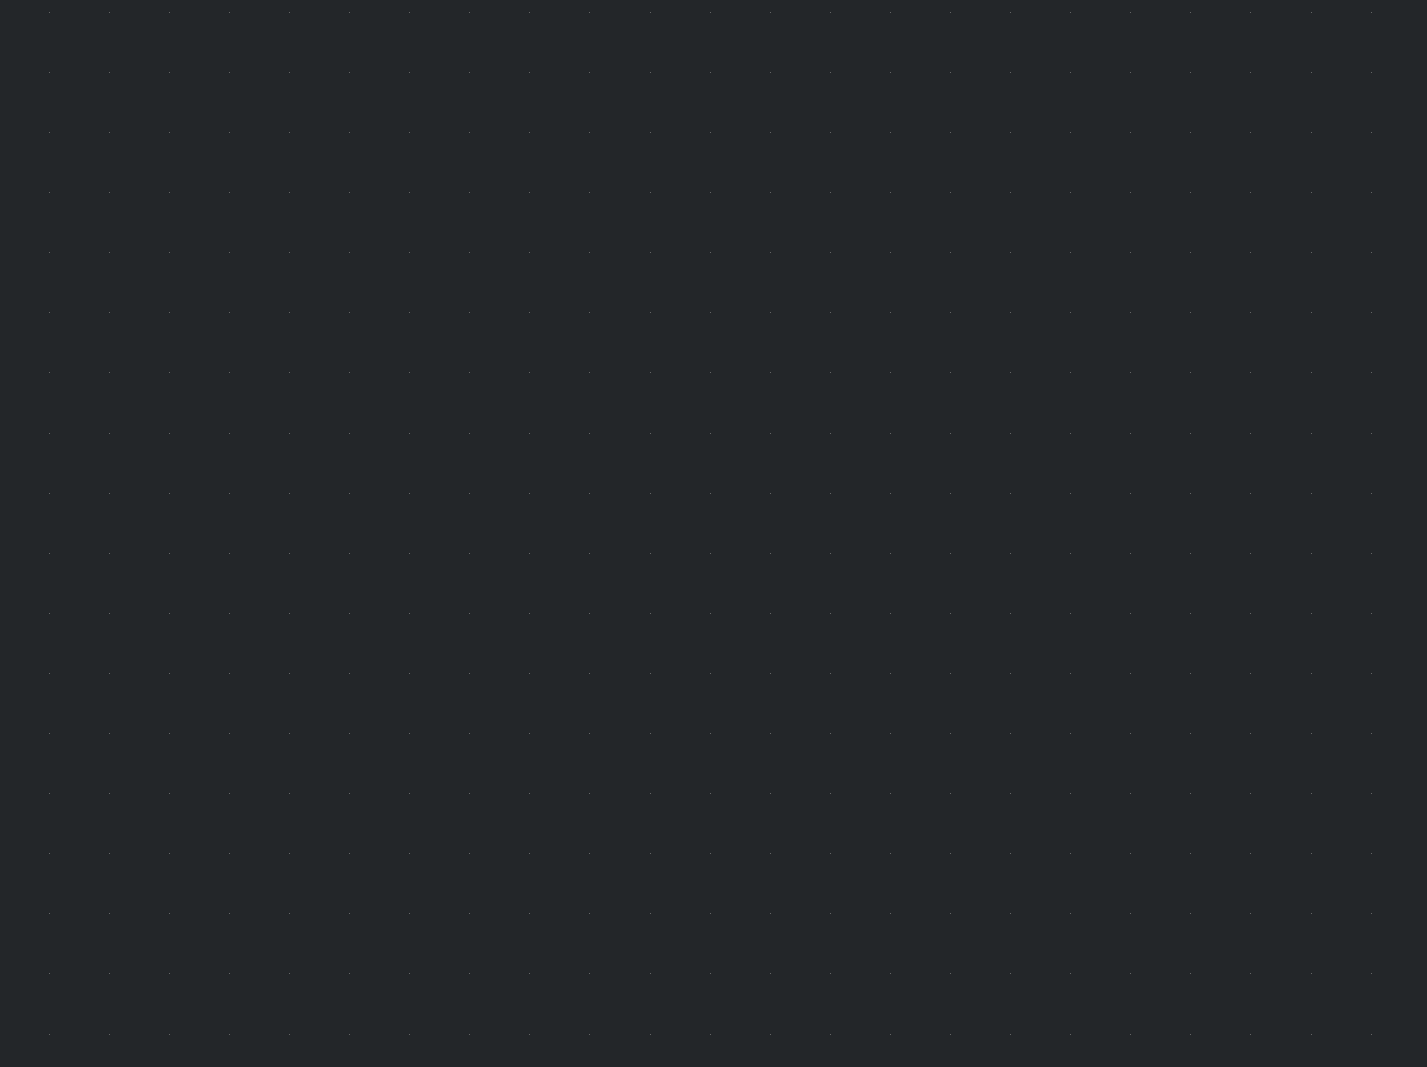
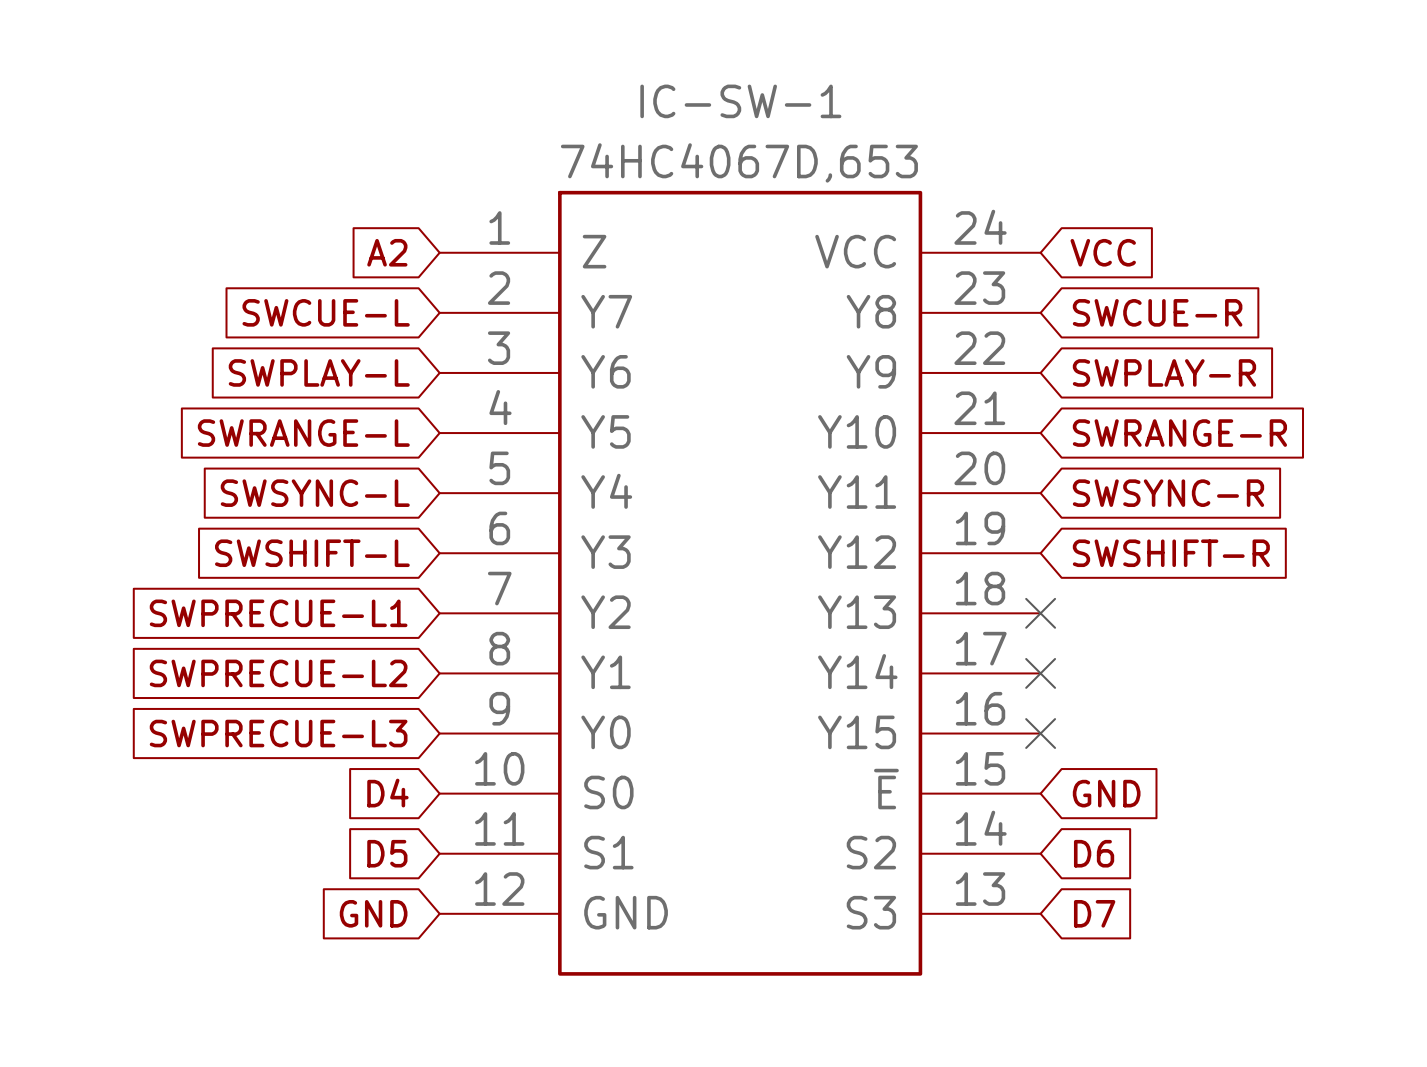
global label: none -> A2 (387, 252)
global label: none -> VCC (1103, 252)
global label: none -> SWCUE-L (326, 312)
global label: none -> SWCUE-R (1157, 312)
global label: none -> SWPLAY-L (319, 372)
global label: none -> SWPLAY-R (1164, 372)
global label: none -> SWRANGE-L (303, 433)
global label: none -> SWRANGE-R (1179, 433)
global label: none -> SWSYNC-L (315, 493)
global label: none -> SWSYNC-R (1168, 493)
global label: none -> SWSHIFT-L (312, 553)
global label: none -> SWSHIFT-R (1171, 553)
IC-SW-1: none -> 74HC4067D,653 (740, 583)
global label: none -> SWPRECUE-L1 (278, 613)
no-connect mark: none -> (1040, 613)
global label: none -> SWPRECUE-L2 (278, 673)
no-connect mark: none -> (1040, 673)
global label: none -> SWPRECUE-L3 (278, 733)
no-connect mark: none -> (1040, 733)
global label: none -> D4 (387, 793)
global label: none -> GND (1106, 793)
global label: none -> D5 (387, 853)
global label: none -> D6 (1094, 853)
global label: none -> GND (373, 913)
global label: none -> D7 (1094, 913)

